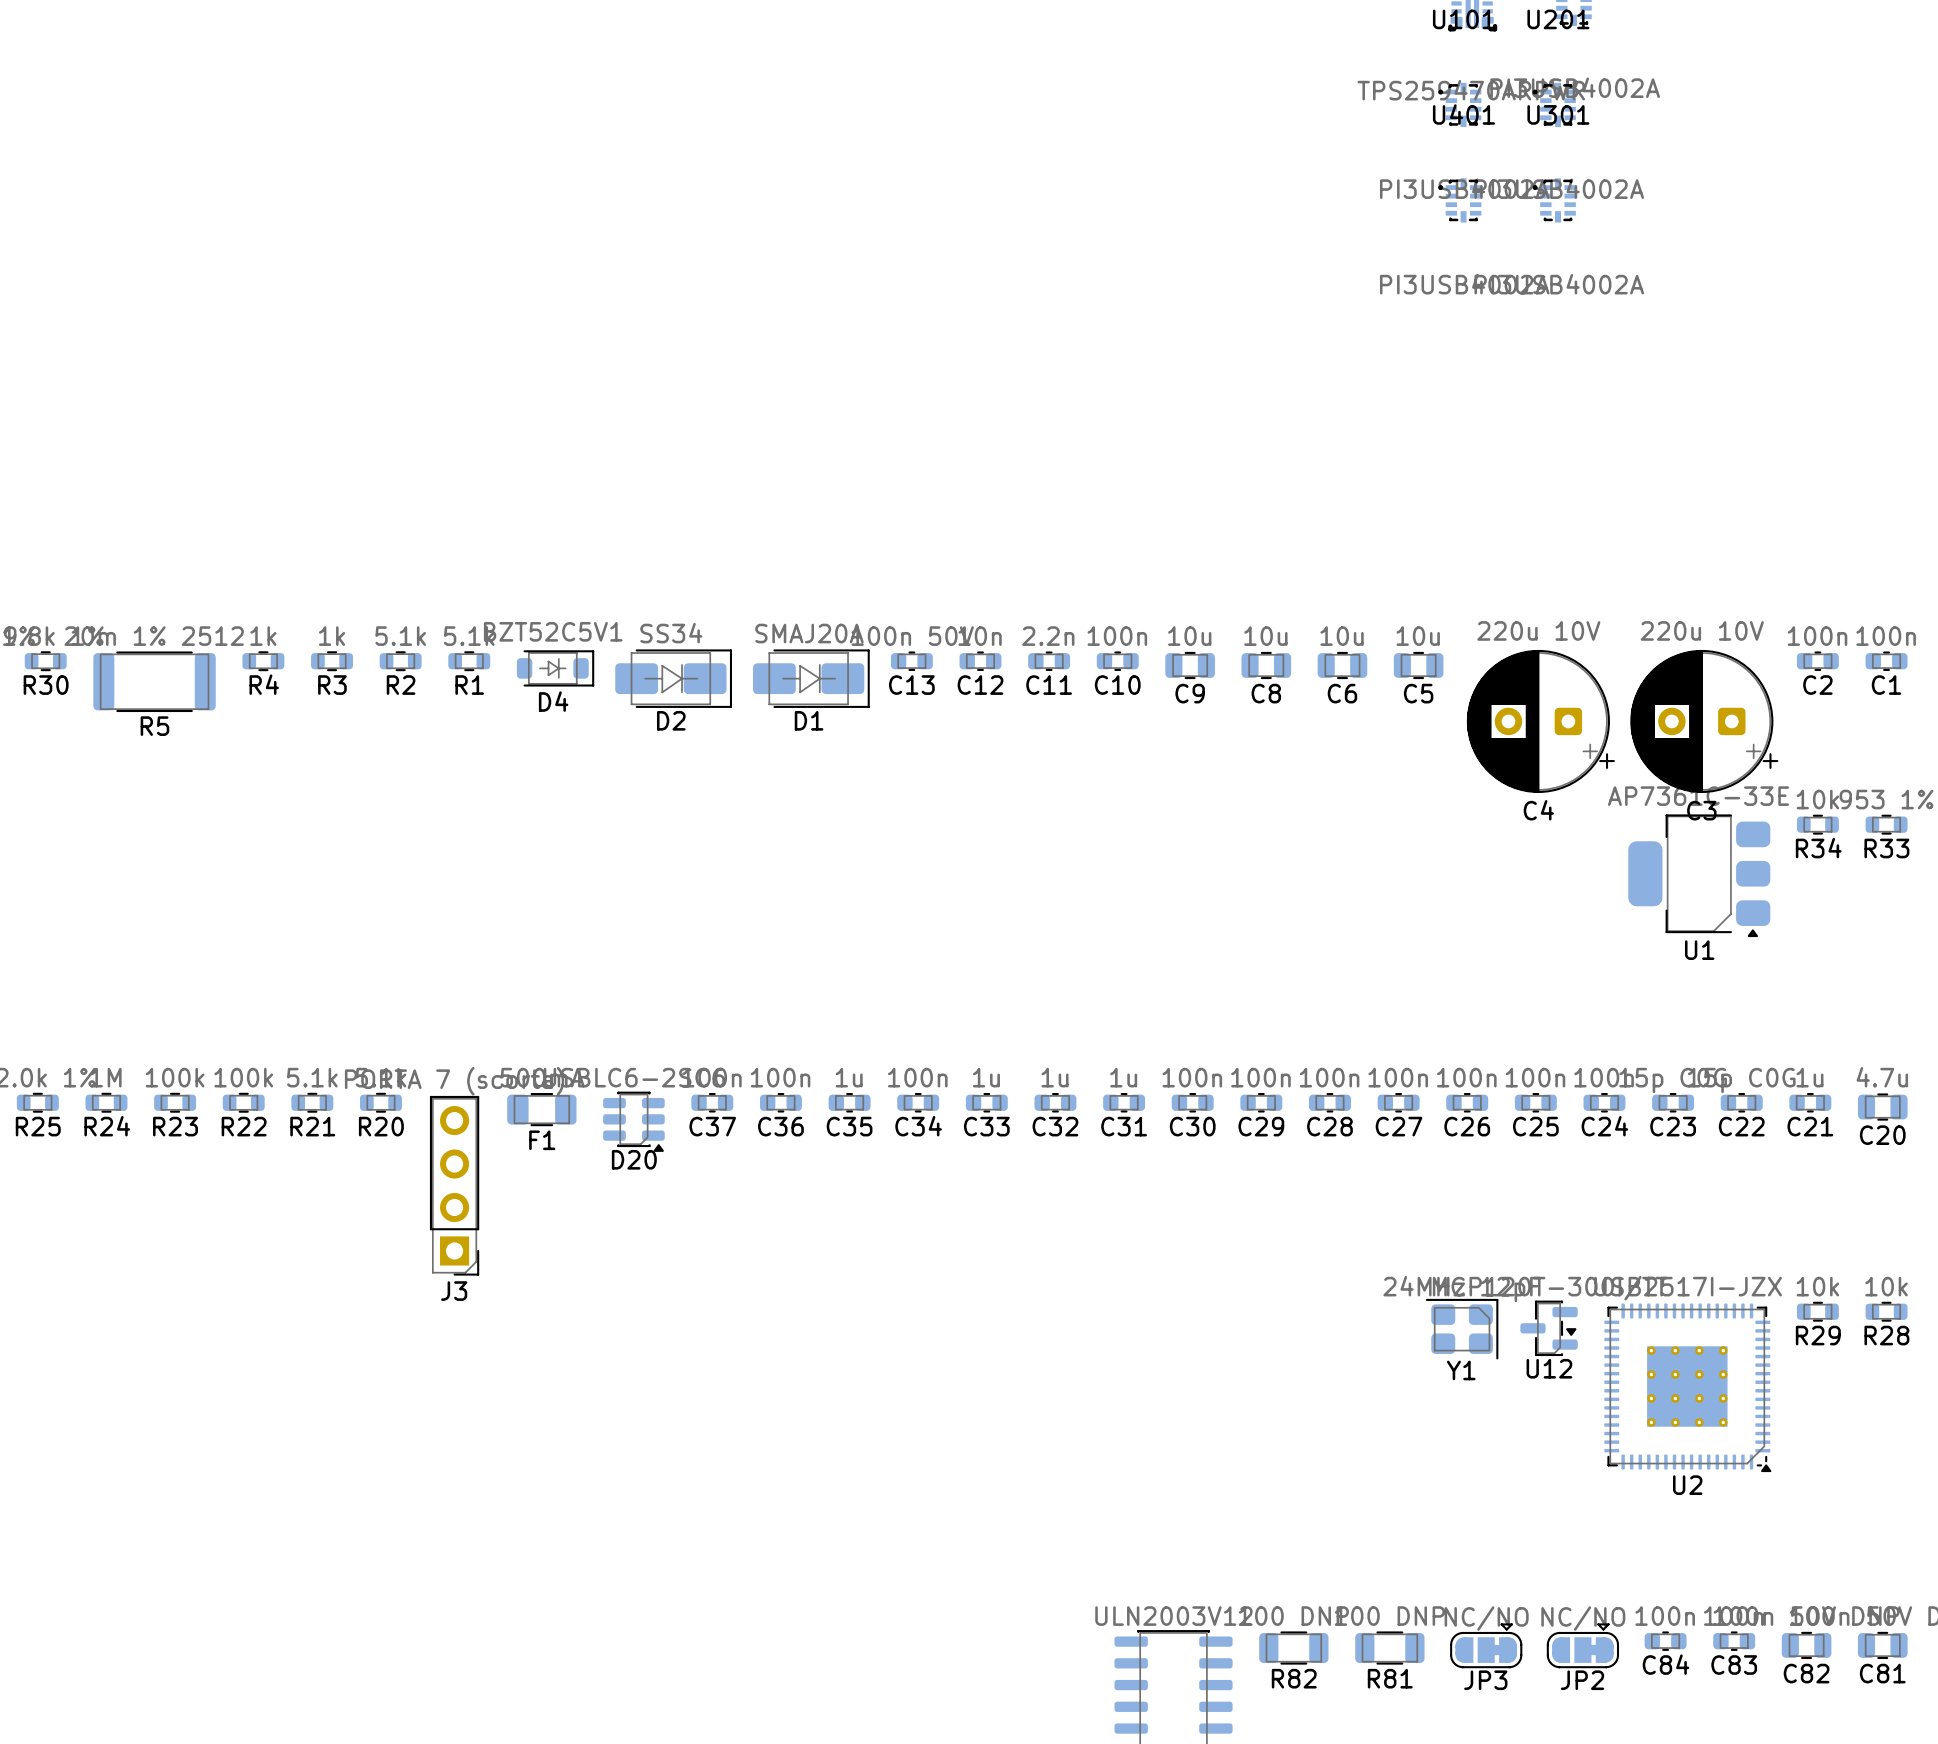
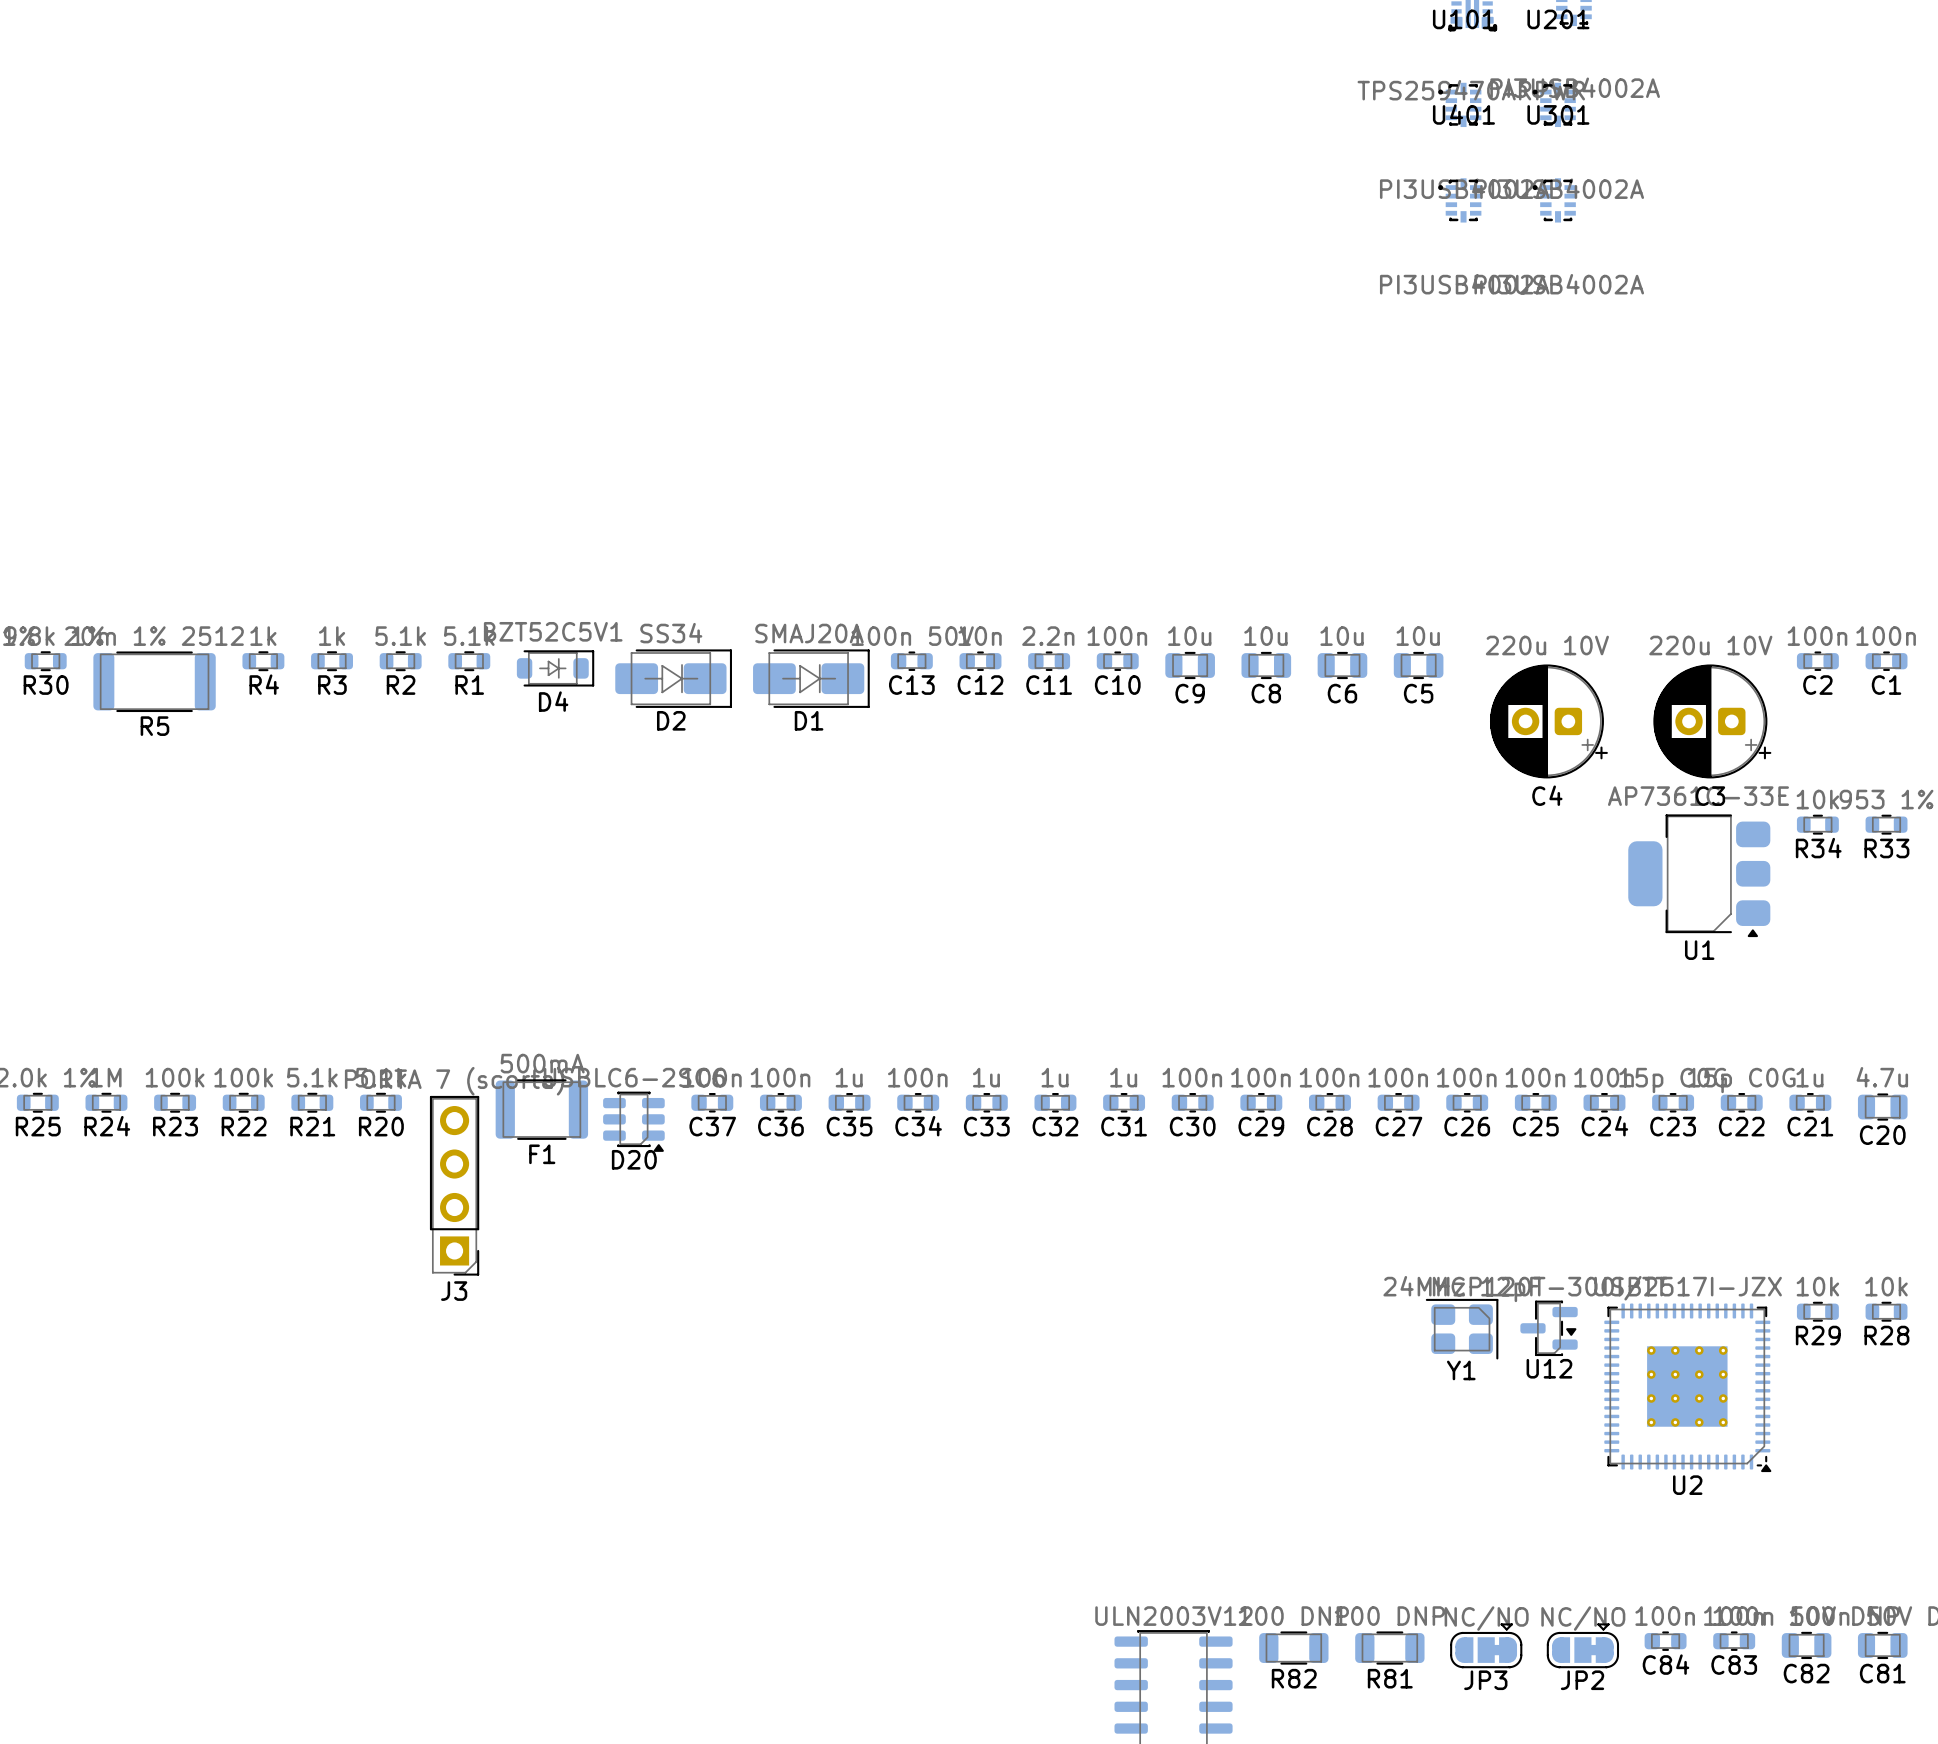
C4 footprint: [1466, 649, 1615, 793] -> [1489, 664, 1608, 779]
C3 footprint: [1630, 649, 1779, 793] -> [1653, 664, 1772, 779]
F1 footprint: [507, 1093, 577, 1127] -> [495, 1079, 589, 1140]

